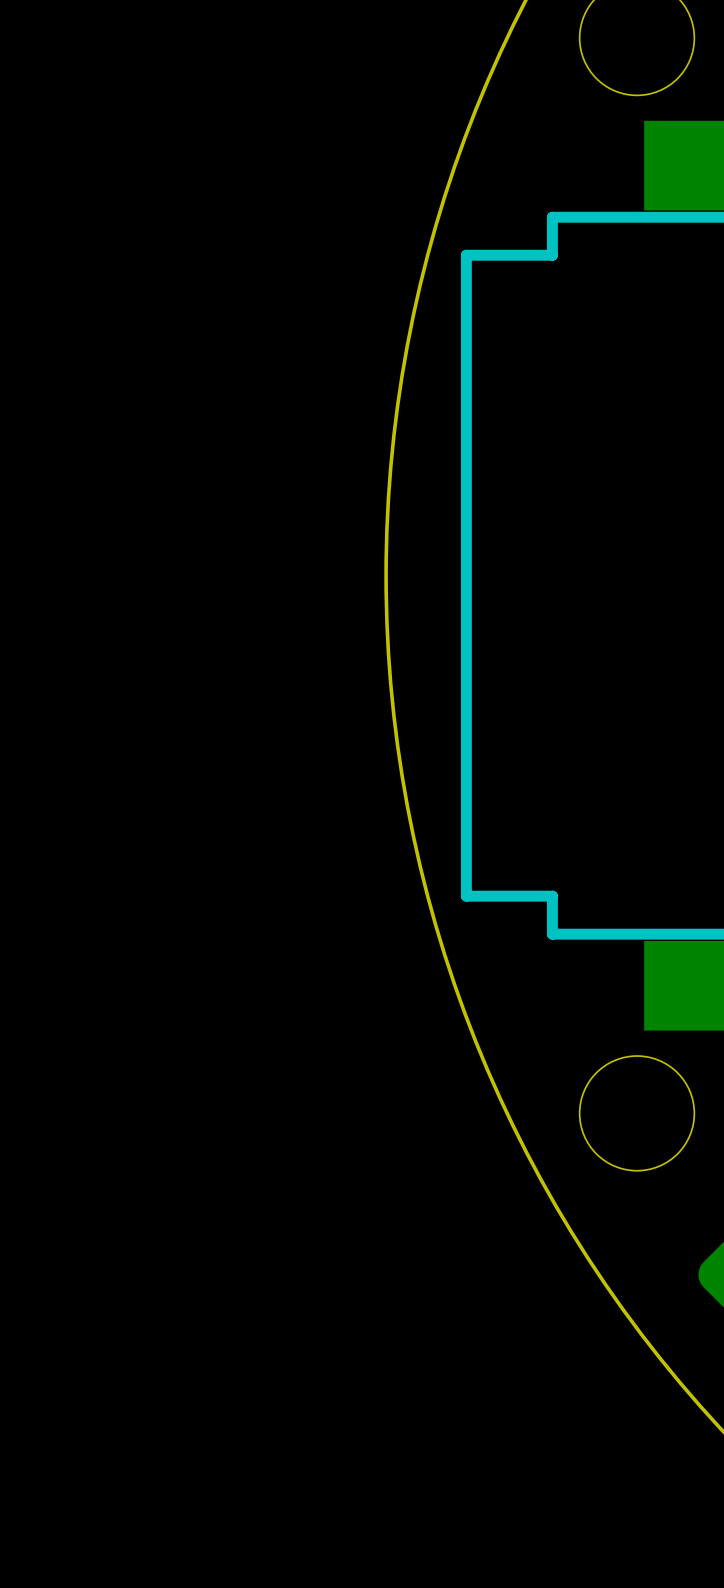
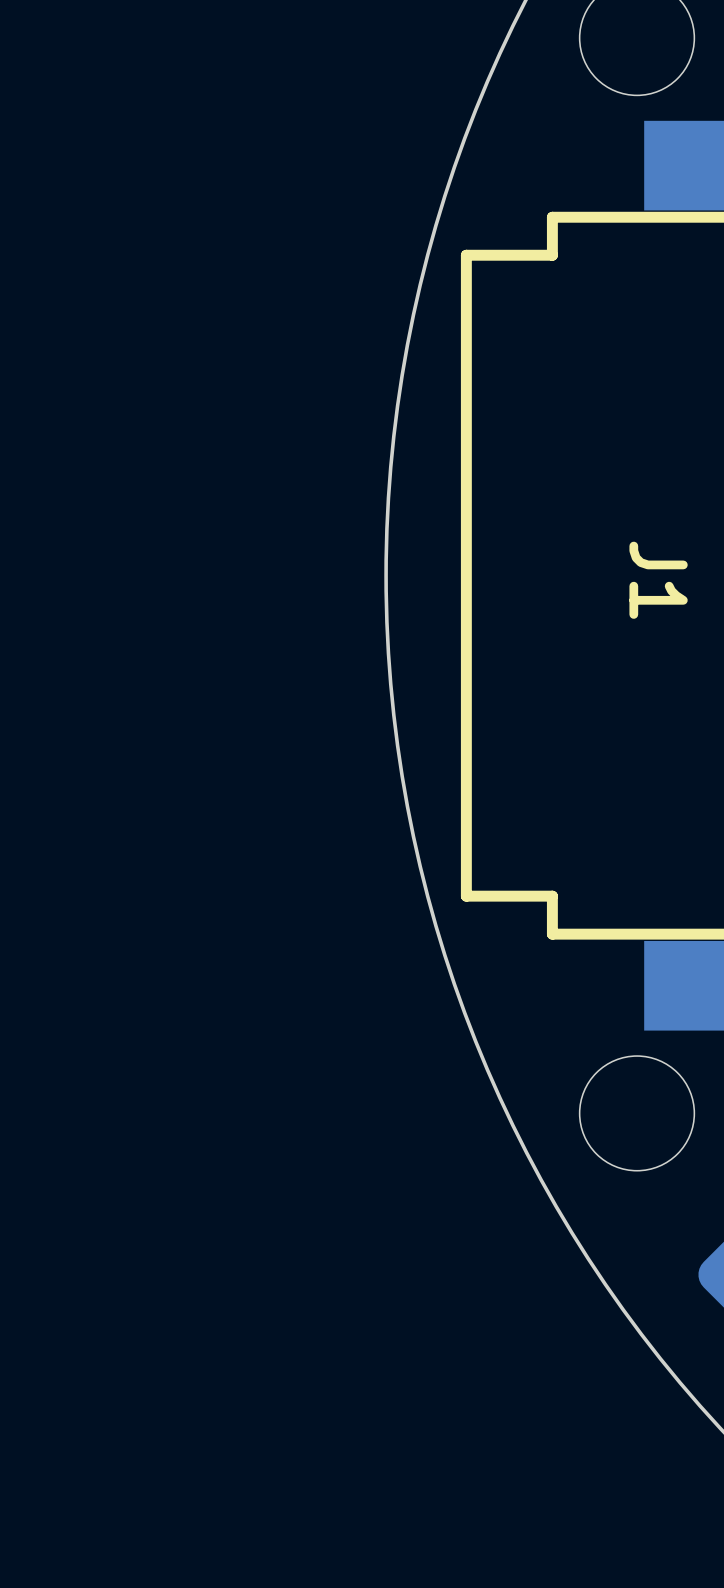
J1 name: none -> J1 (658, 580)

